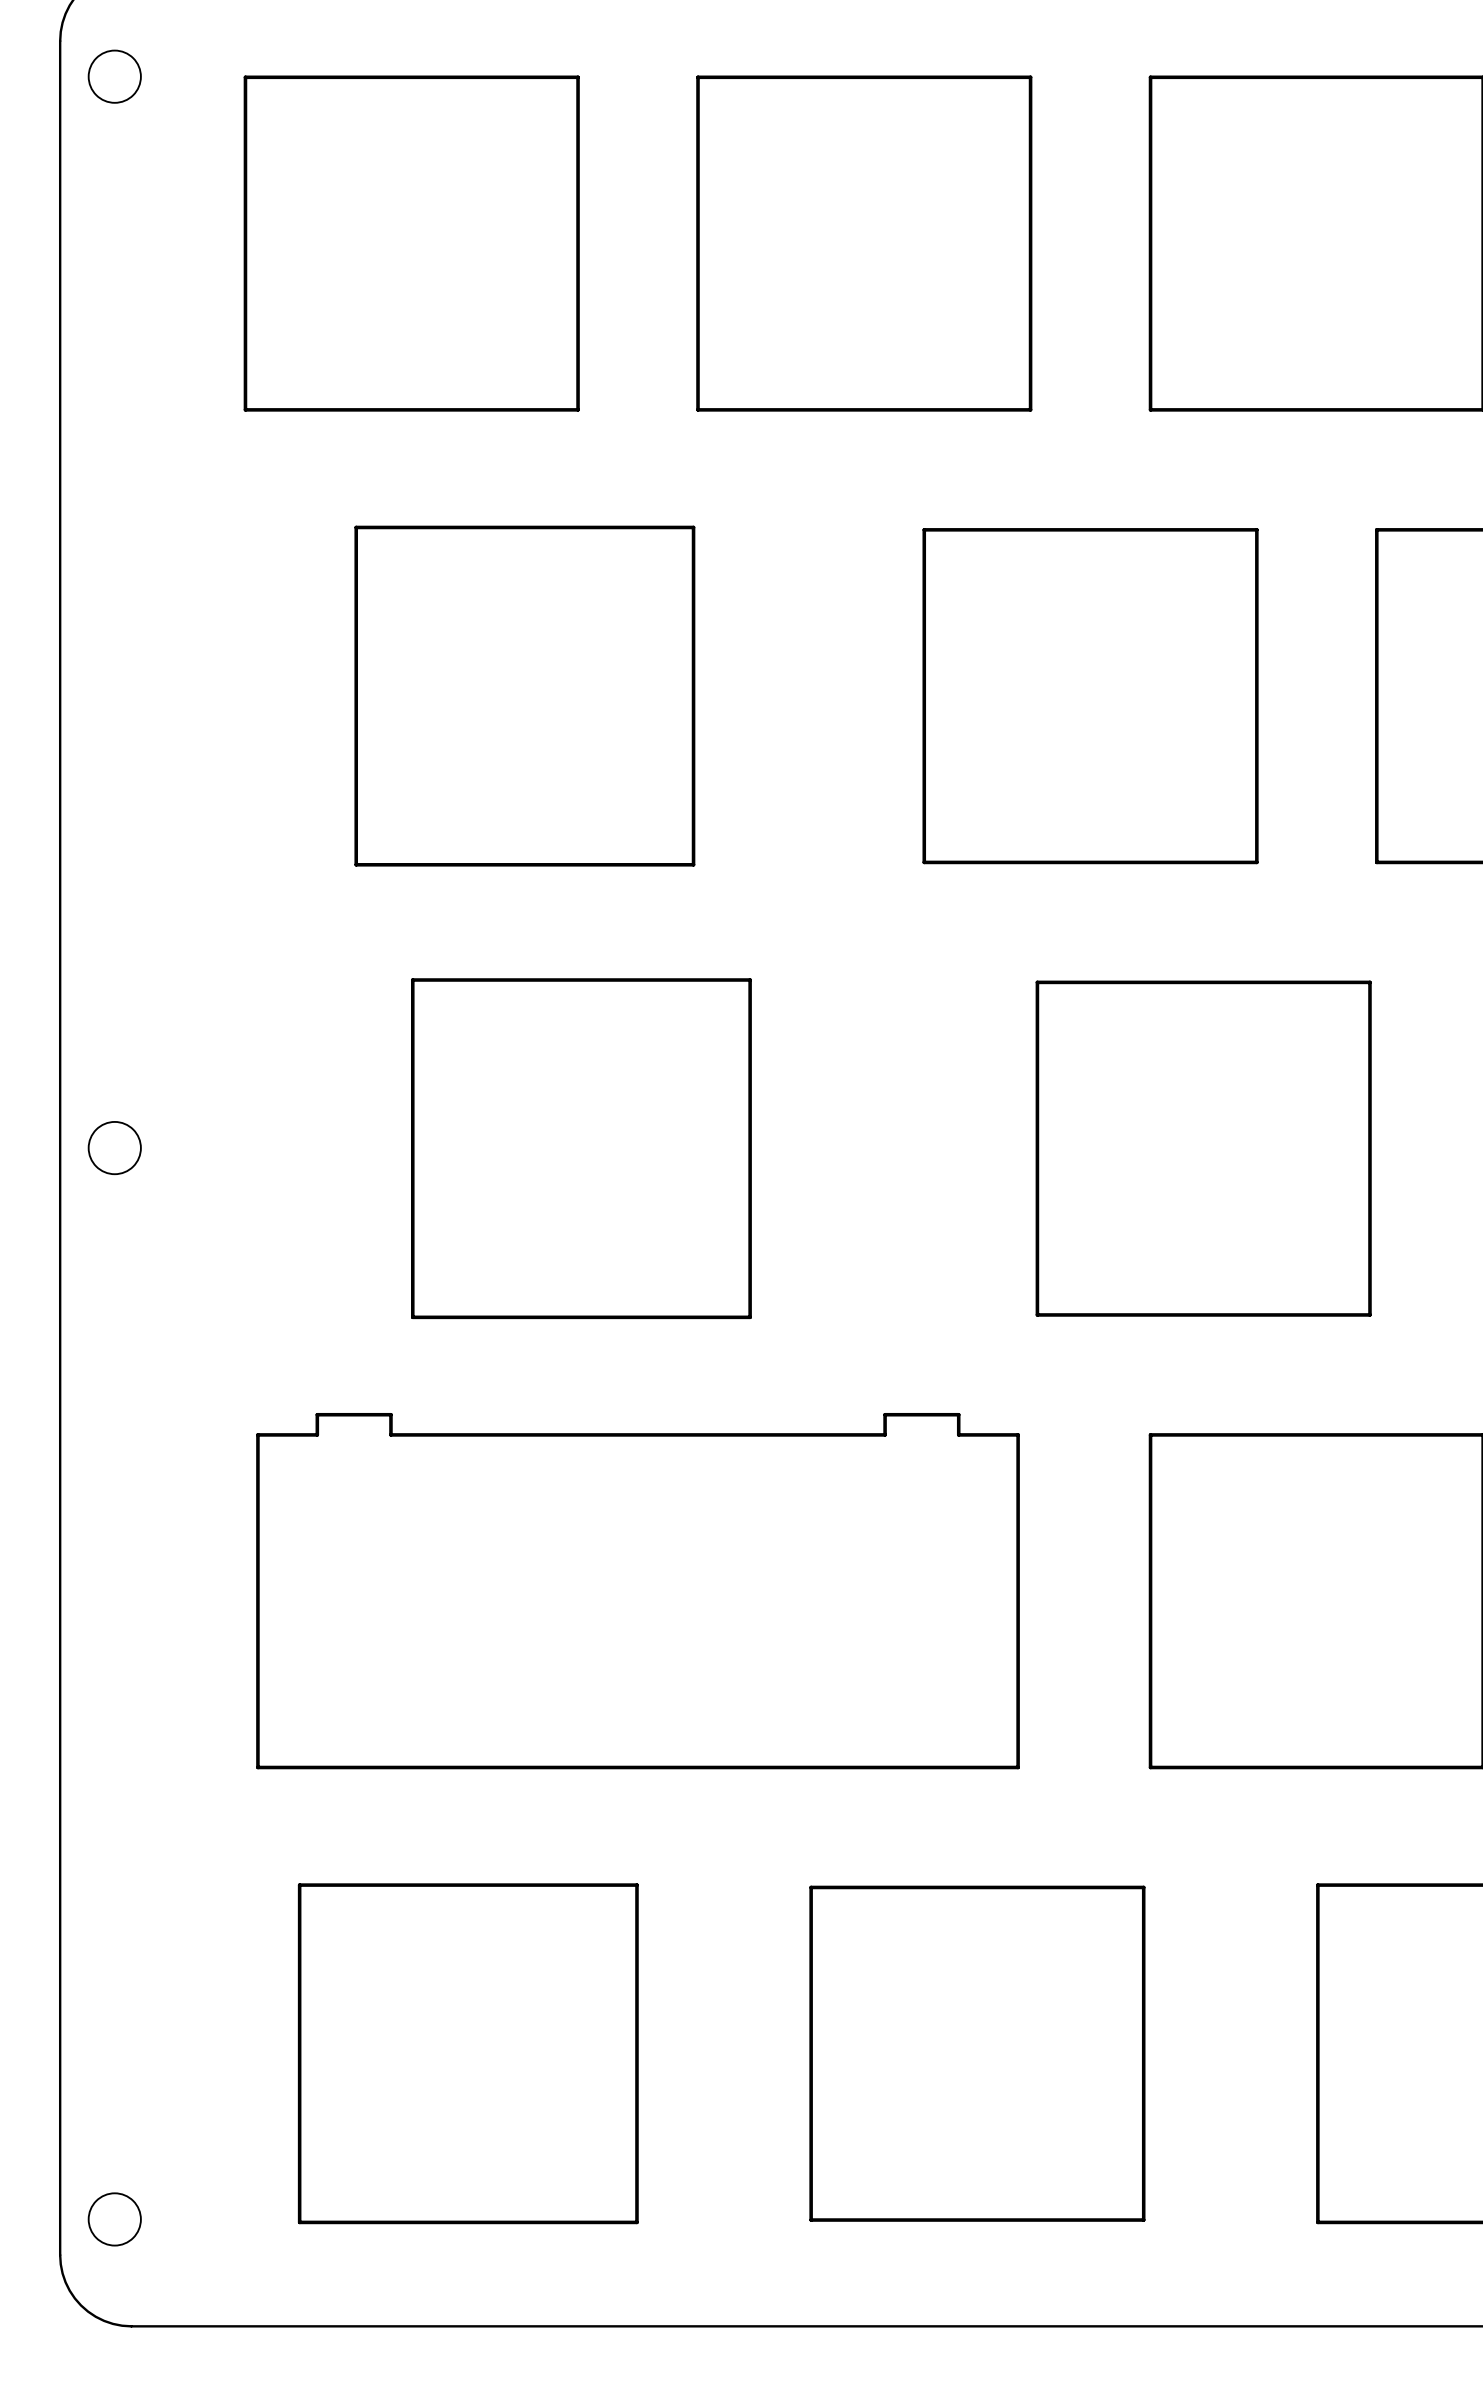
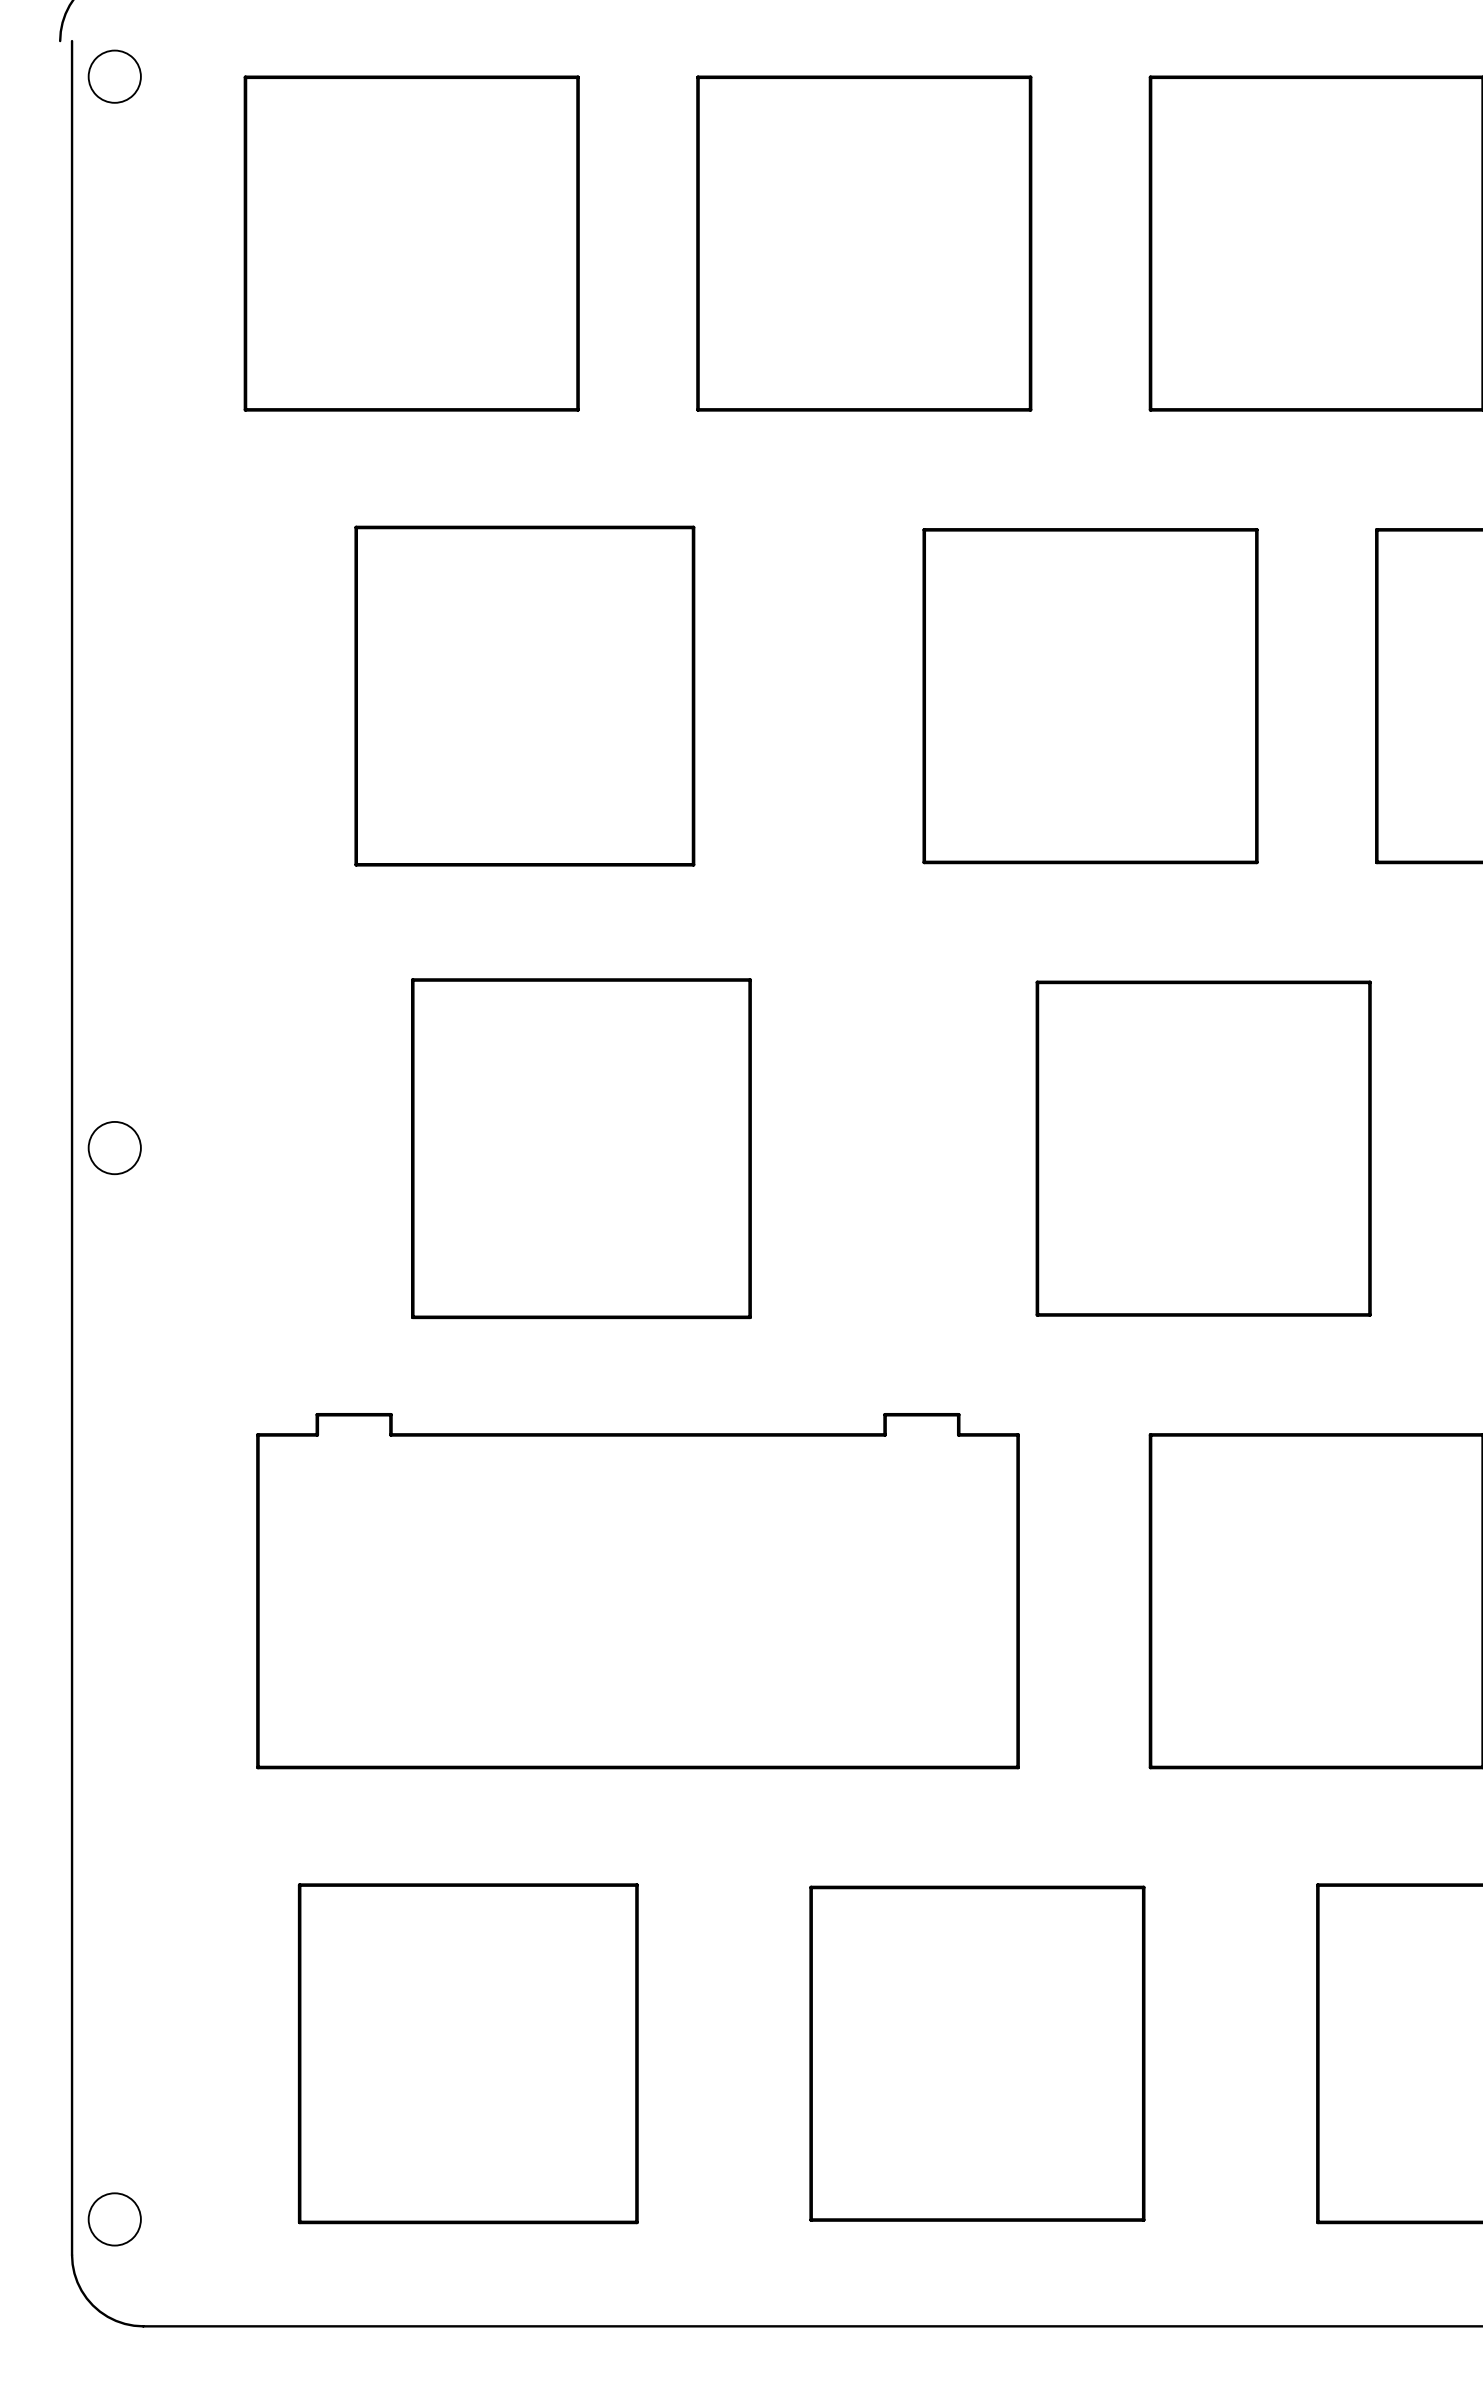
board edge: (60, 41) (60, 2255) (62, 2273) (69, 2290) (88, 2311) (112, 2323) (143, 2326) -> (72, 41) (72, 2255) (77, 2282) (92, 2305) (116, 2320) (143, 2326)

